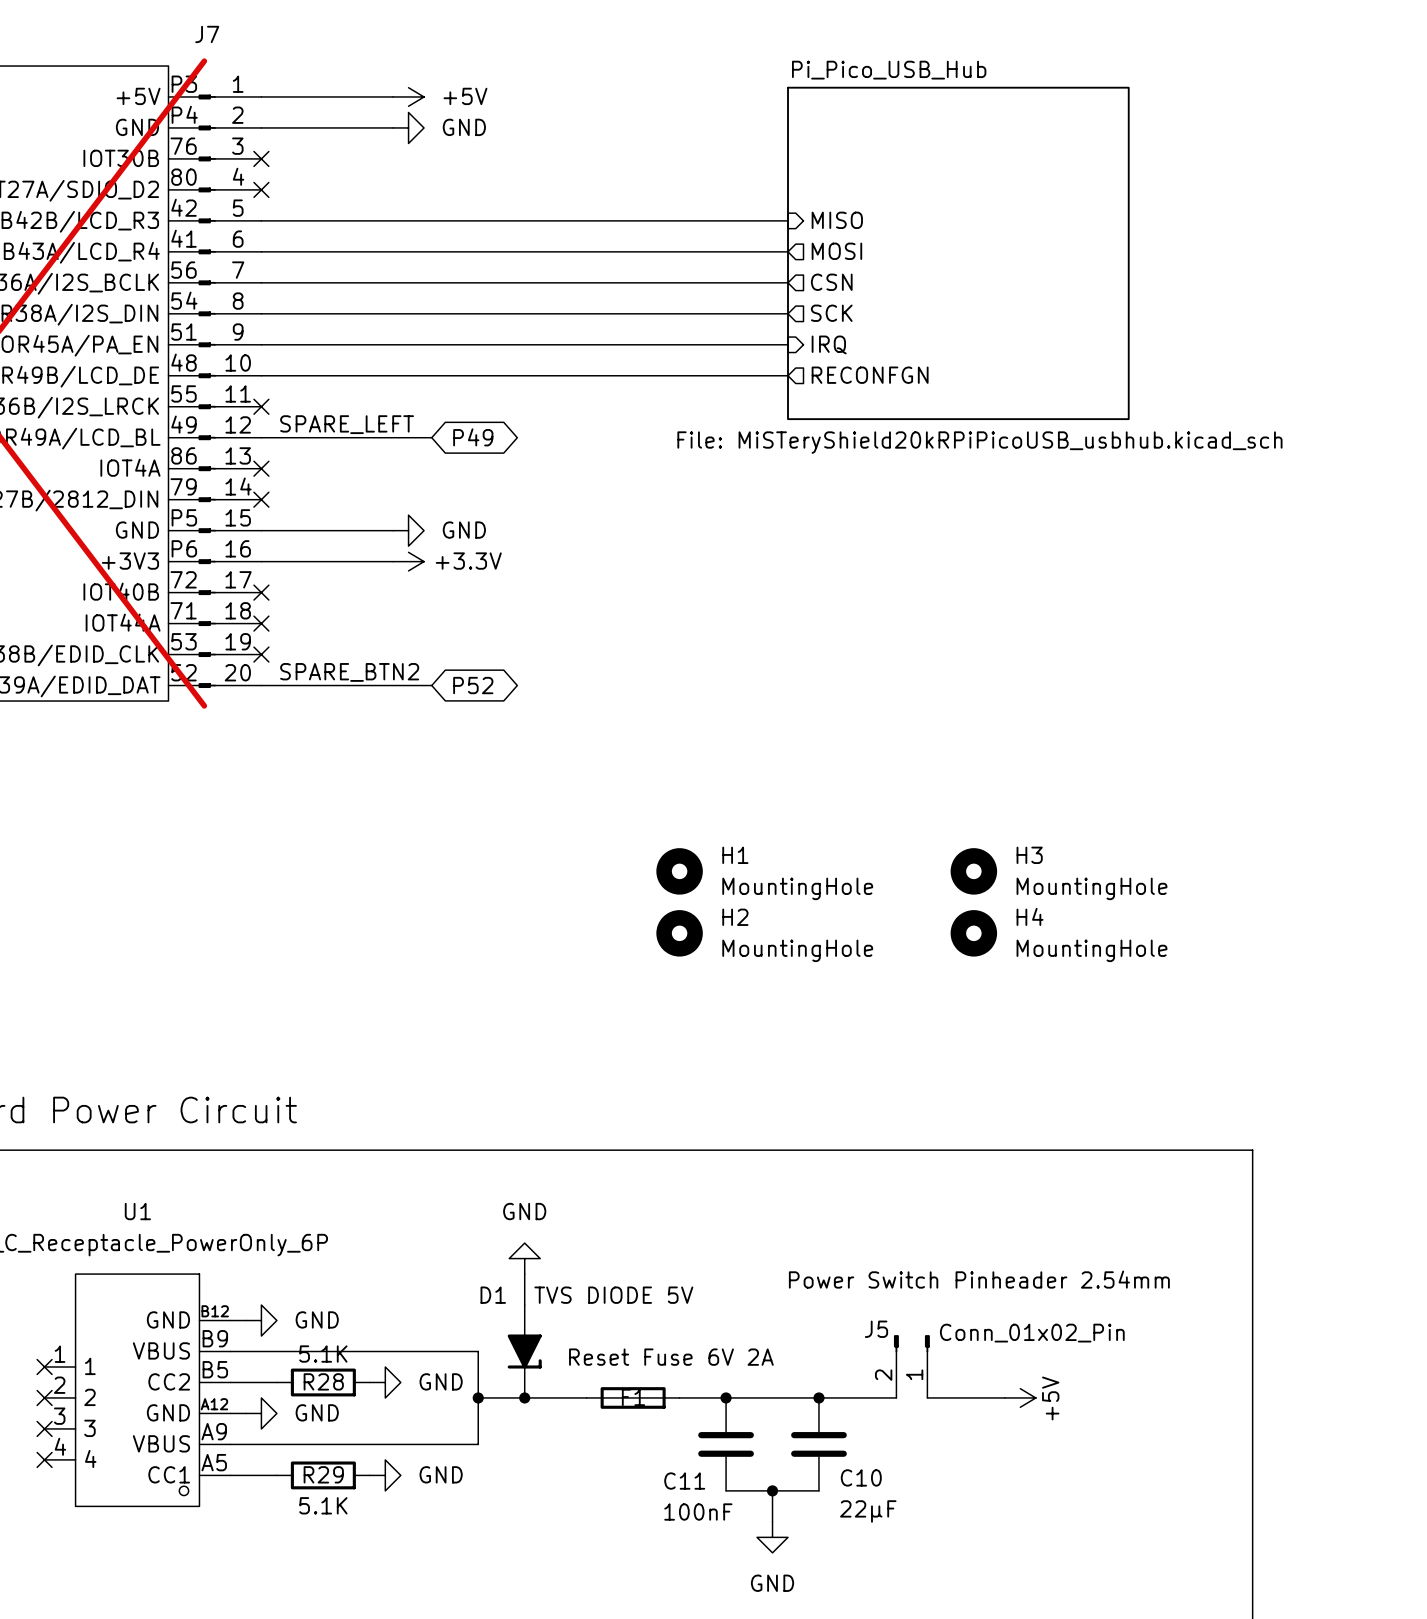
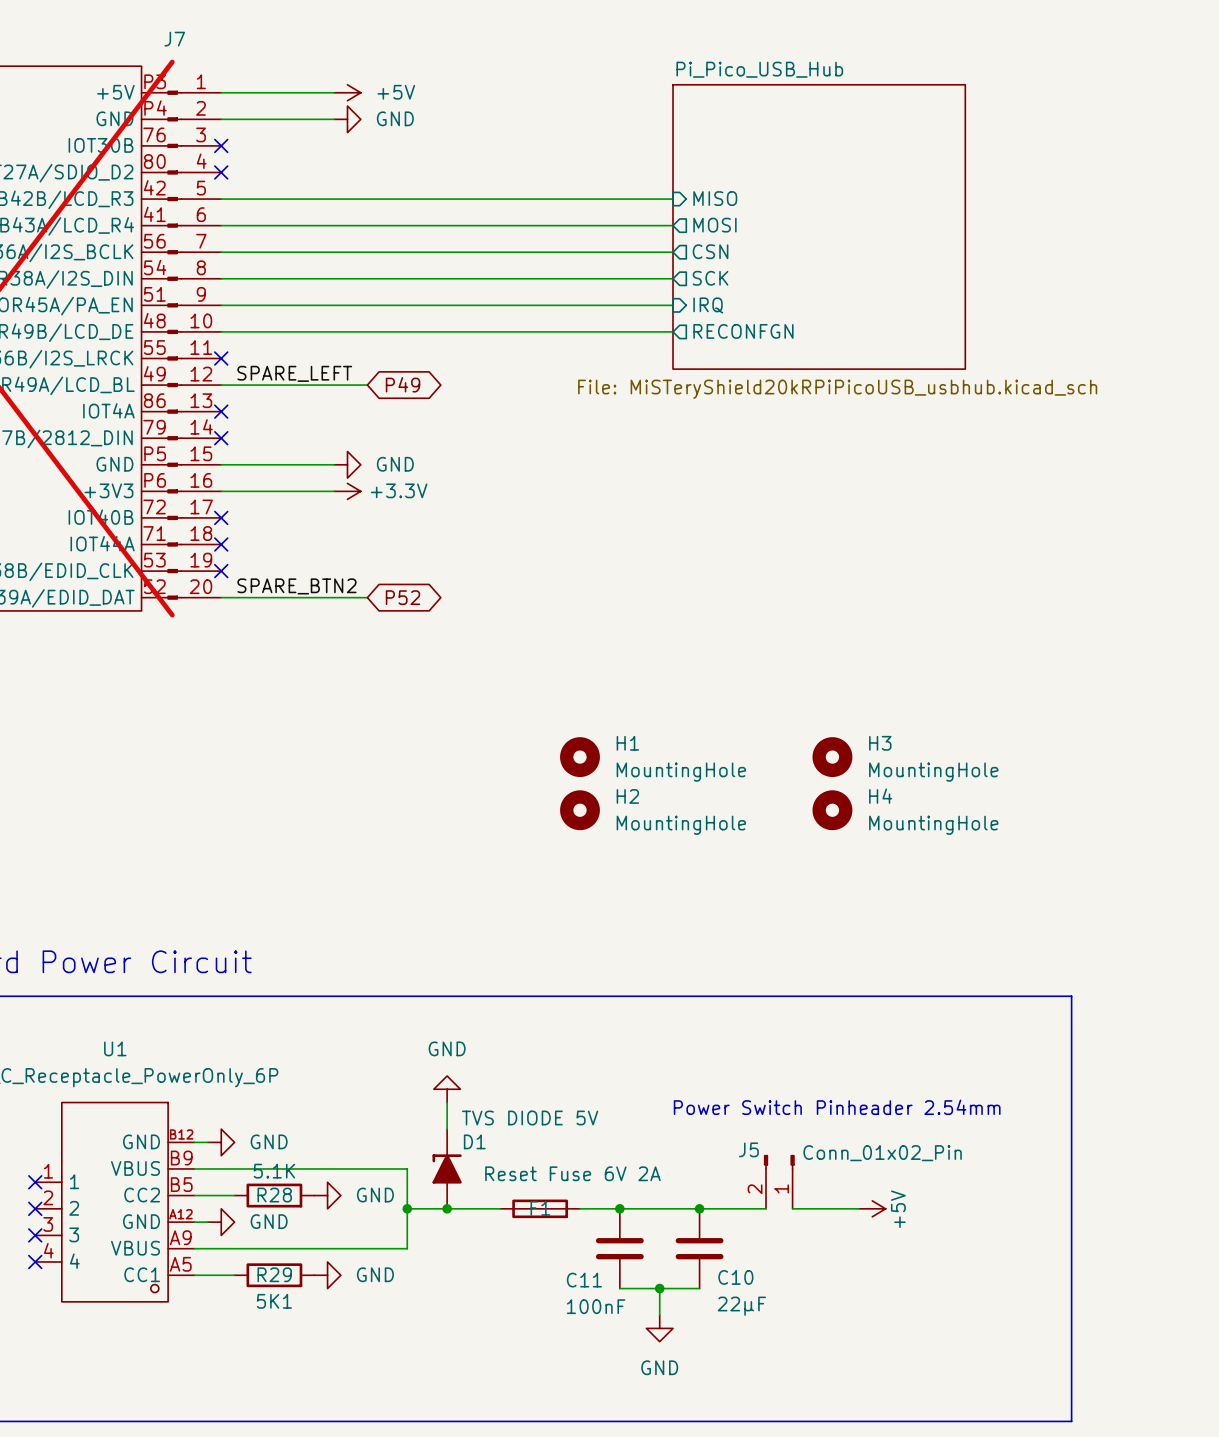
D1 name position: D1 (493, 1295) -> D1 (474, 1141)
D1 value position: TVS DIODE 5V (613, 1295) -> TVS DIODE 5V (530, 1117)
D1 rotation: 0° (524, 1351) -> 180° (447, 1168)
R29 value: 5.1K (323, 1505) -> 5K1 (274, 1301)

